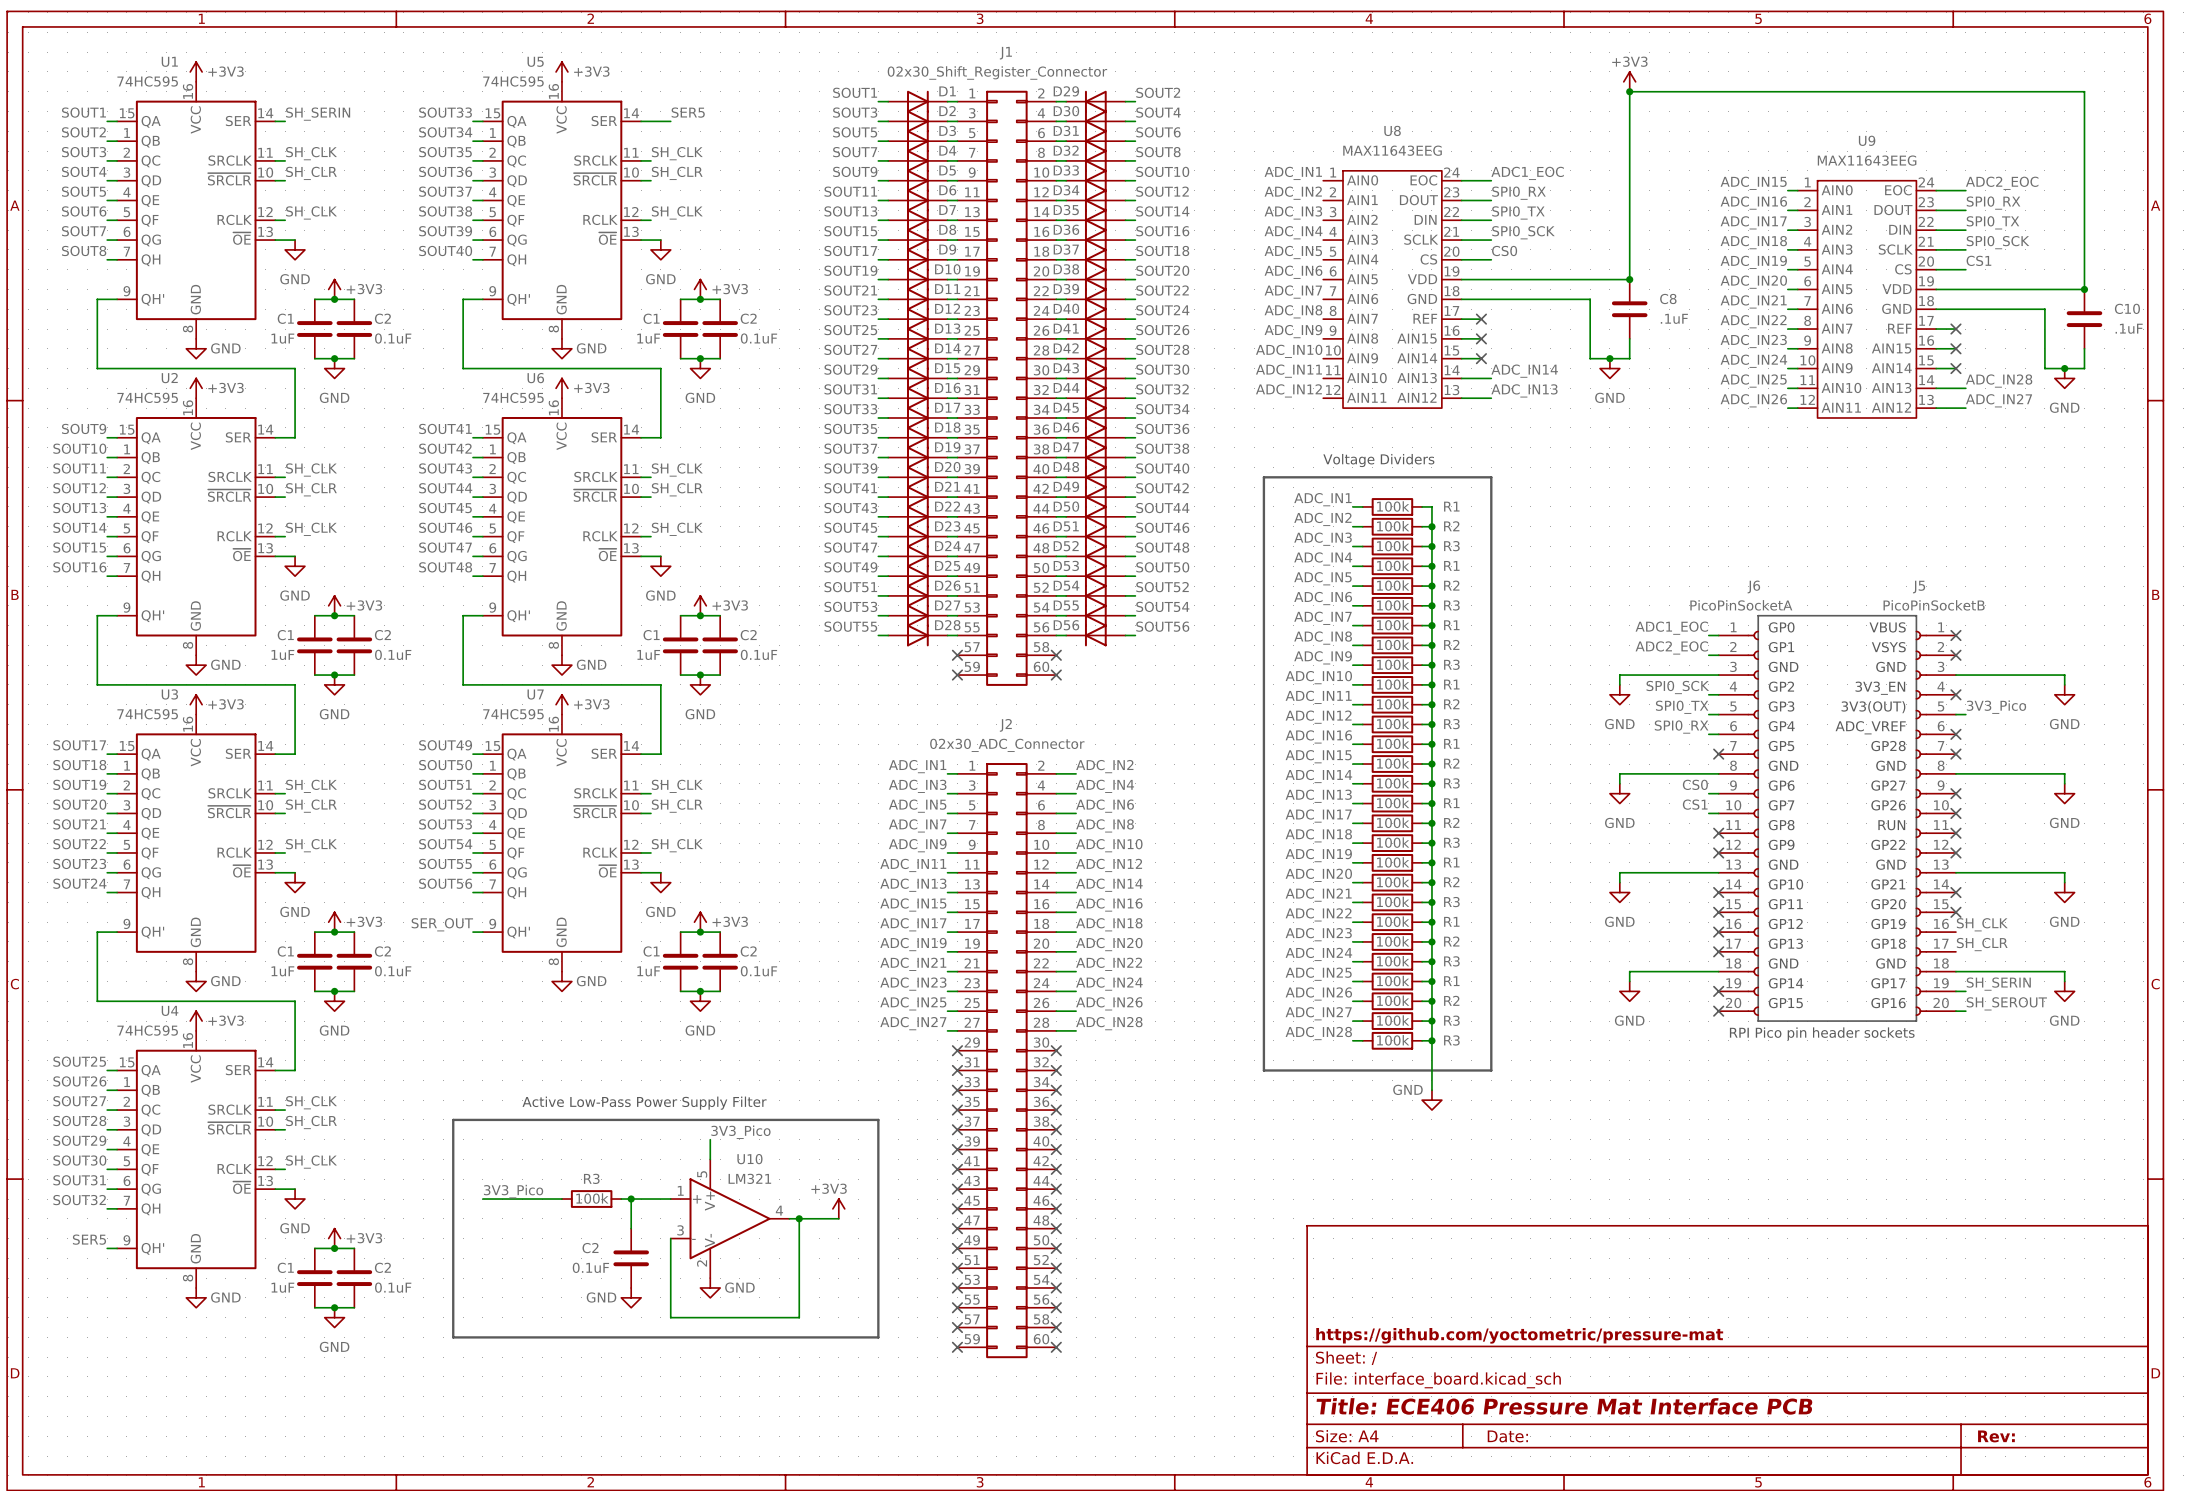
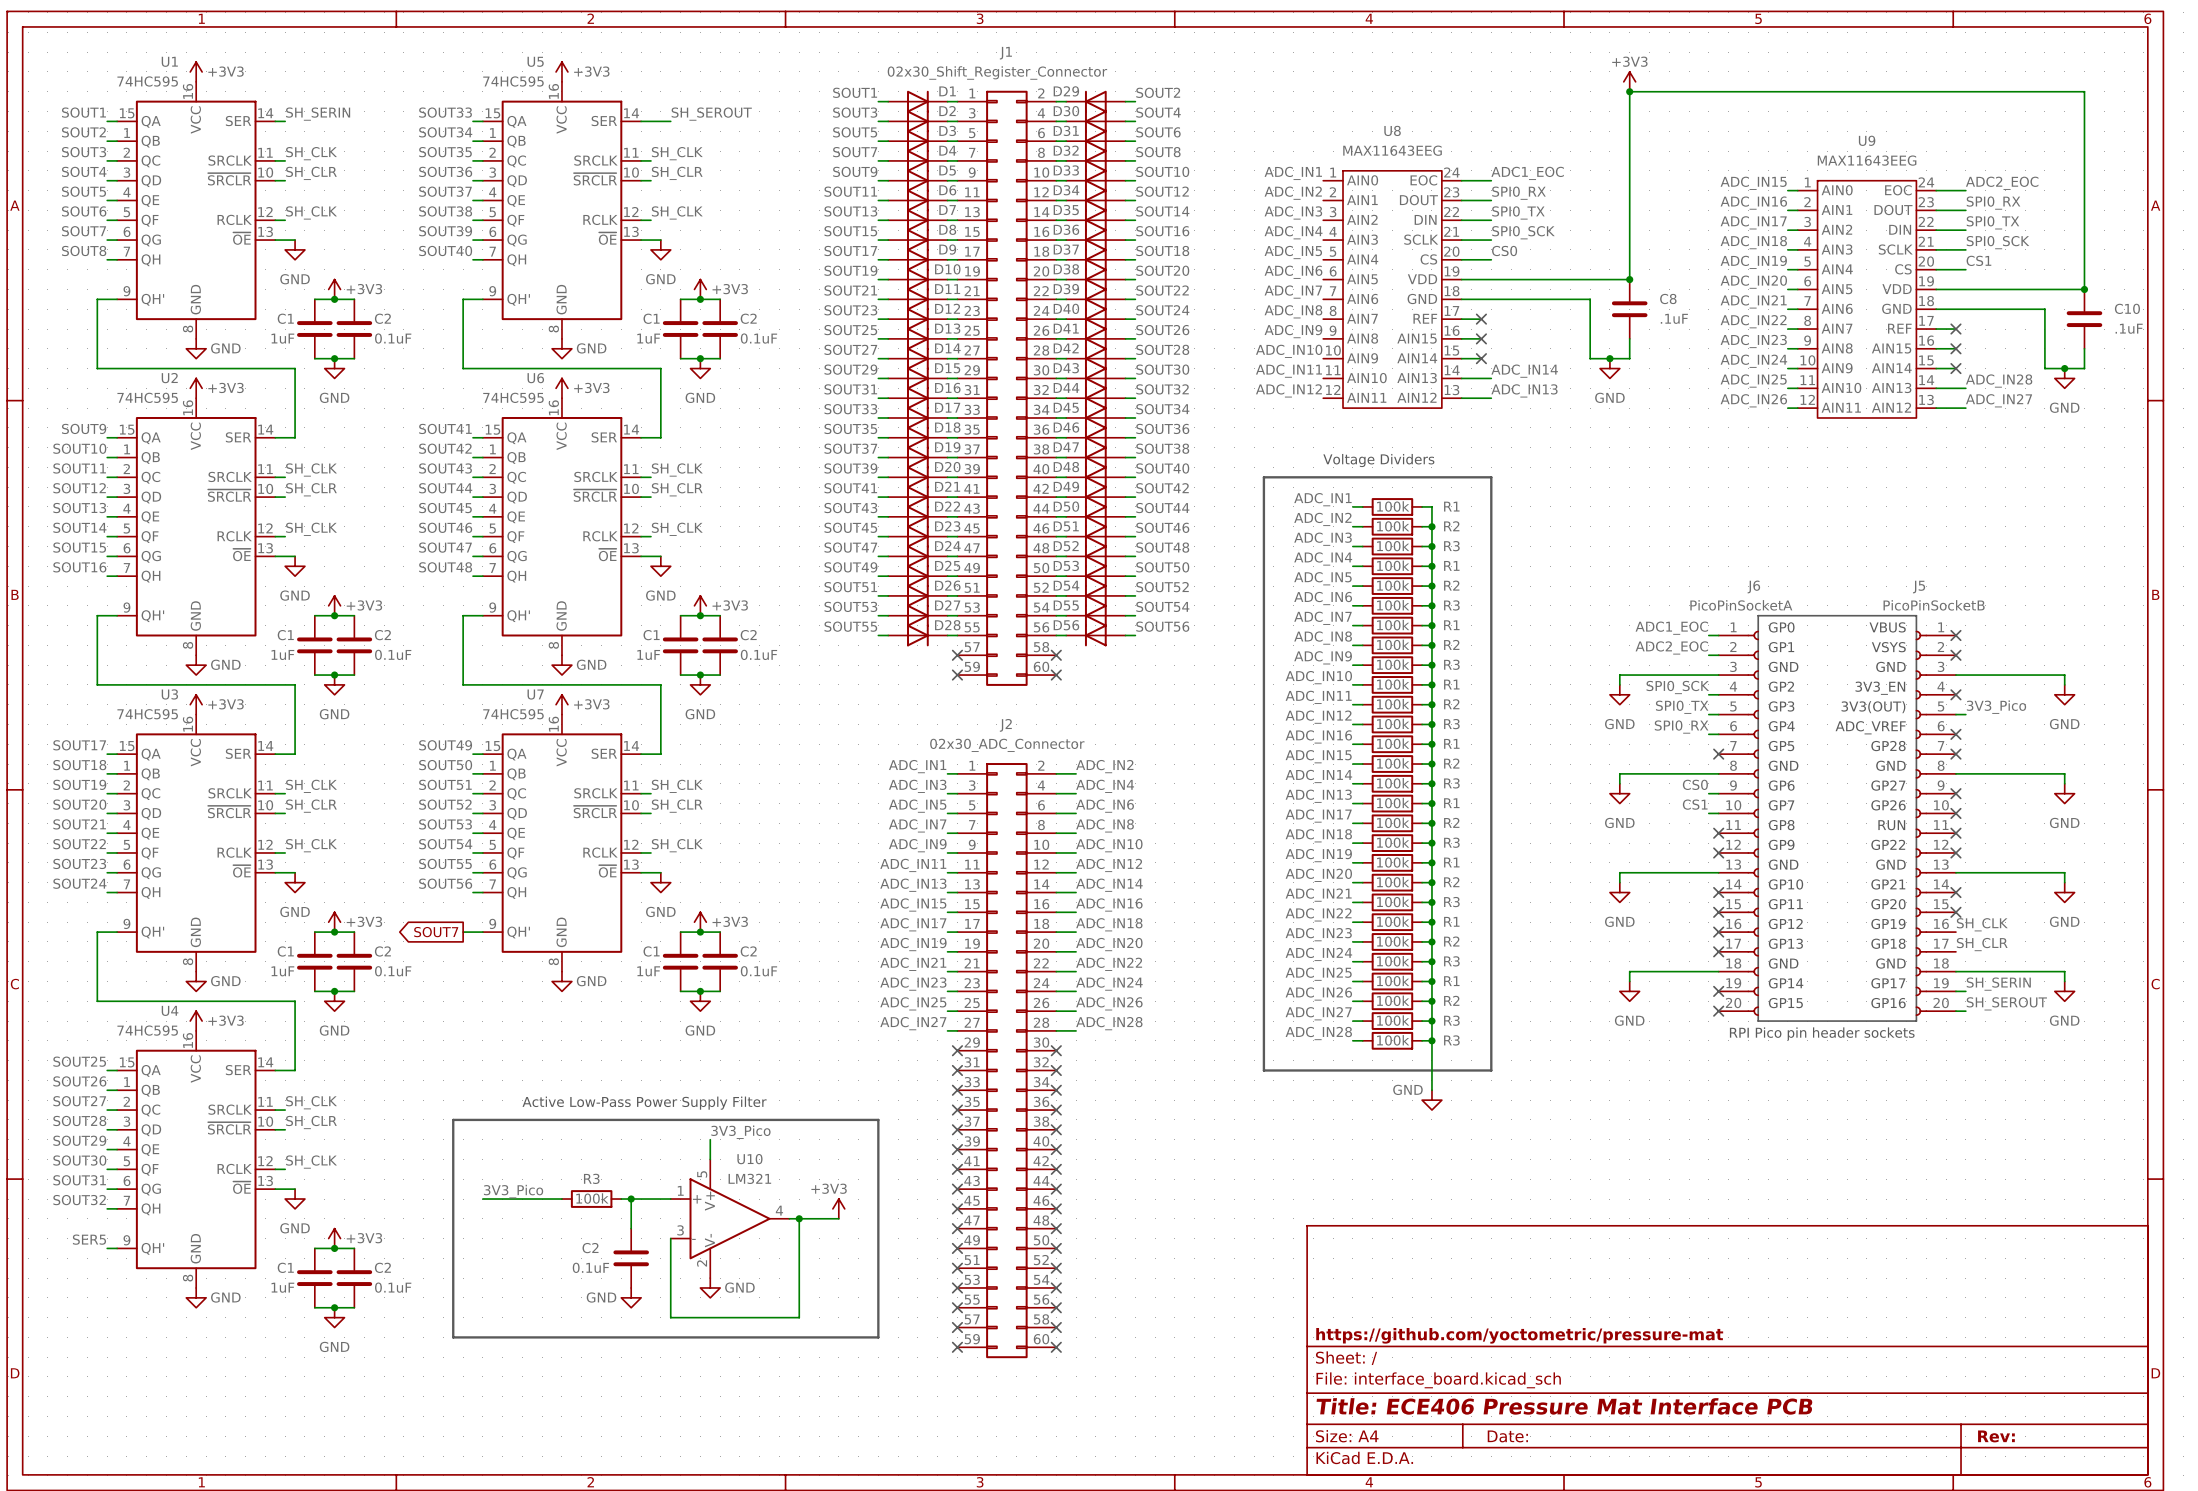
label: SER5 (688, 112) -> SH_SEROUT (711, 114)
label: SER_OUT (442, 924) -> none
global label: none -> SOUT7 (436, 932)
wire: none -> (463, 932) (473, 932)

